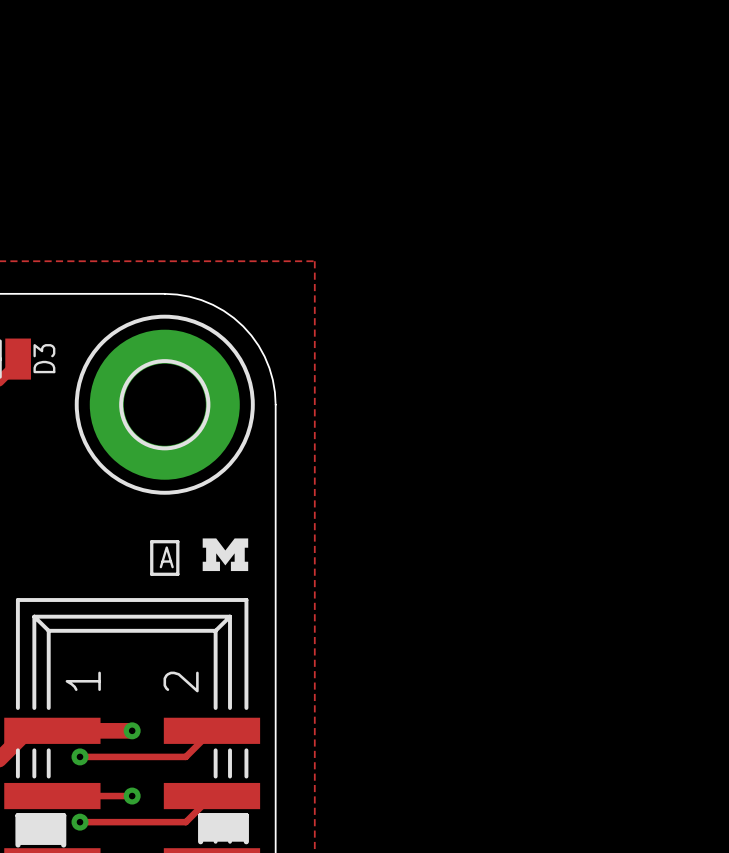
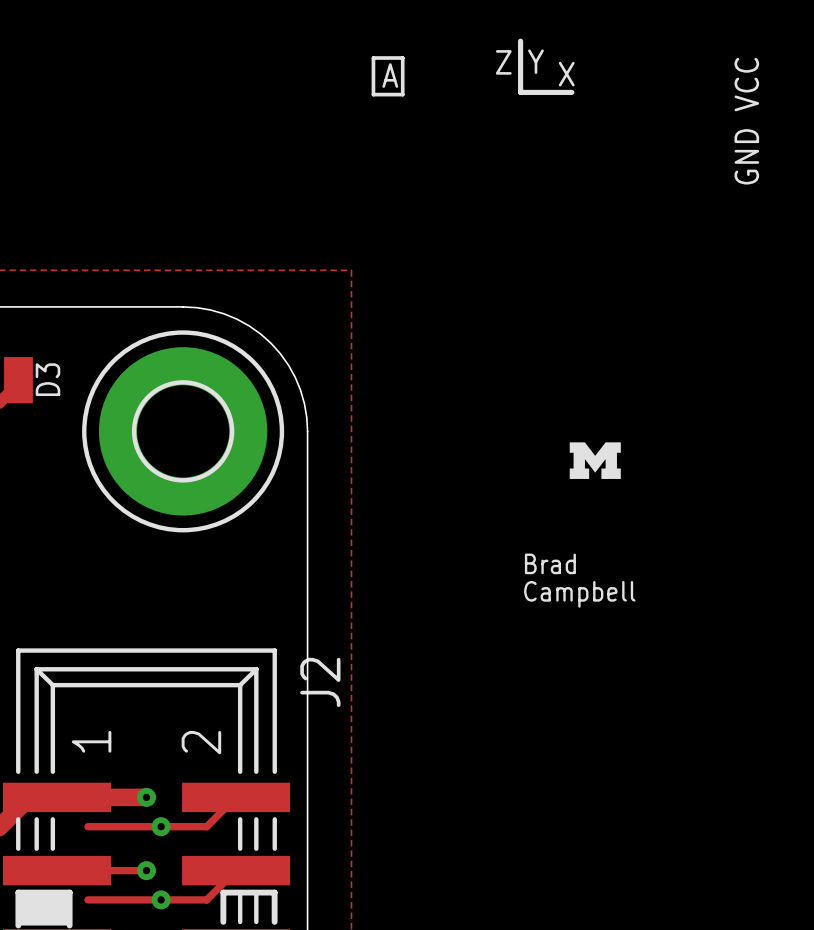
line: none -> (520, 41) (520, 92) (571, 92)
text: none -> Y (535, 61)
text: none -> Z (503, 62)
text: none -> X (566, 74)
text: none -> VCC (746, 84)
text: none -> GND (746, 156)
text: none -> Brad (550, 563)
line: (151, 541) (151, 574) (177, 574) (177, 541) (151, 541) -> (373, 58) (373, 94) (402, 94) (402, 58) (373, 58)
text: none -> Campbell (579, 594)
drawing position: (225, 554) -> (595, 460)
text position: A (166, 557) -> A (390, 75)
J2 name: none -> J2 (320, 682)
via: (80, 756) -> none
via: none -> (161, 826)
drawing: [200, 815, 247, 842] -> none
via: (80, 822) -> none
via: none -> (161, 899)

